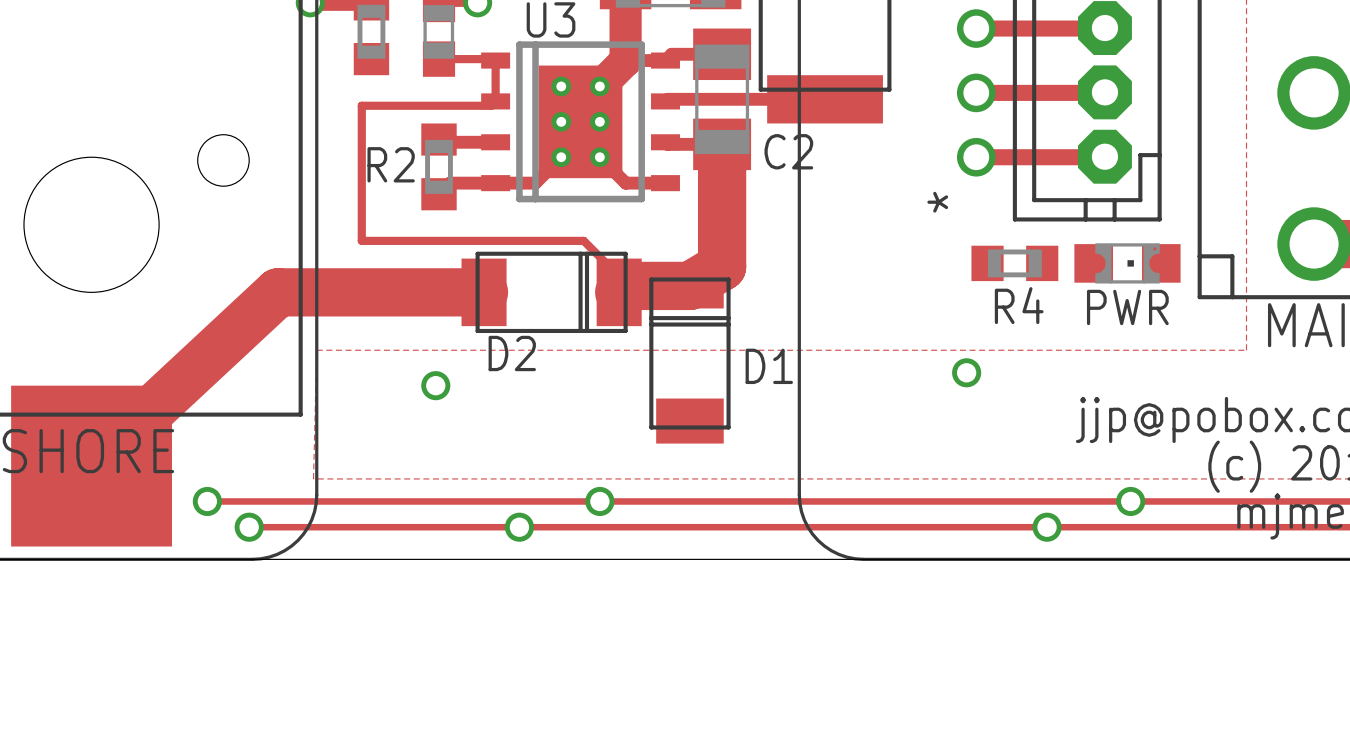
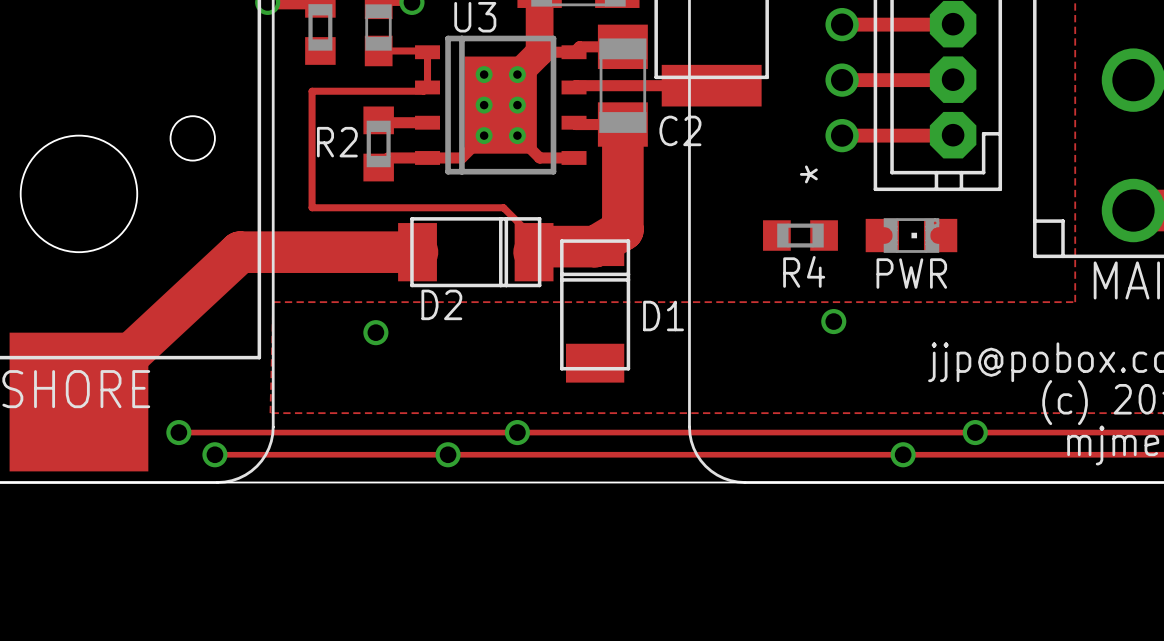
R4 position: (1014, 263) -> (800, 235)
PWR position: (1127, 263) -> (911, 235)

